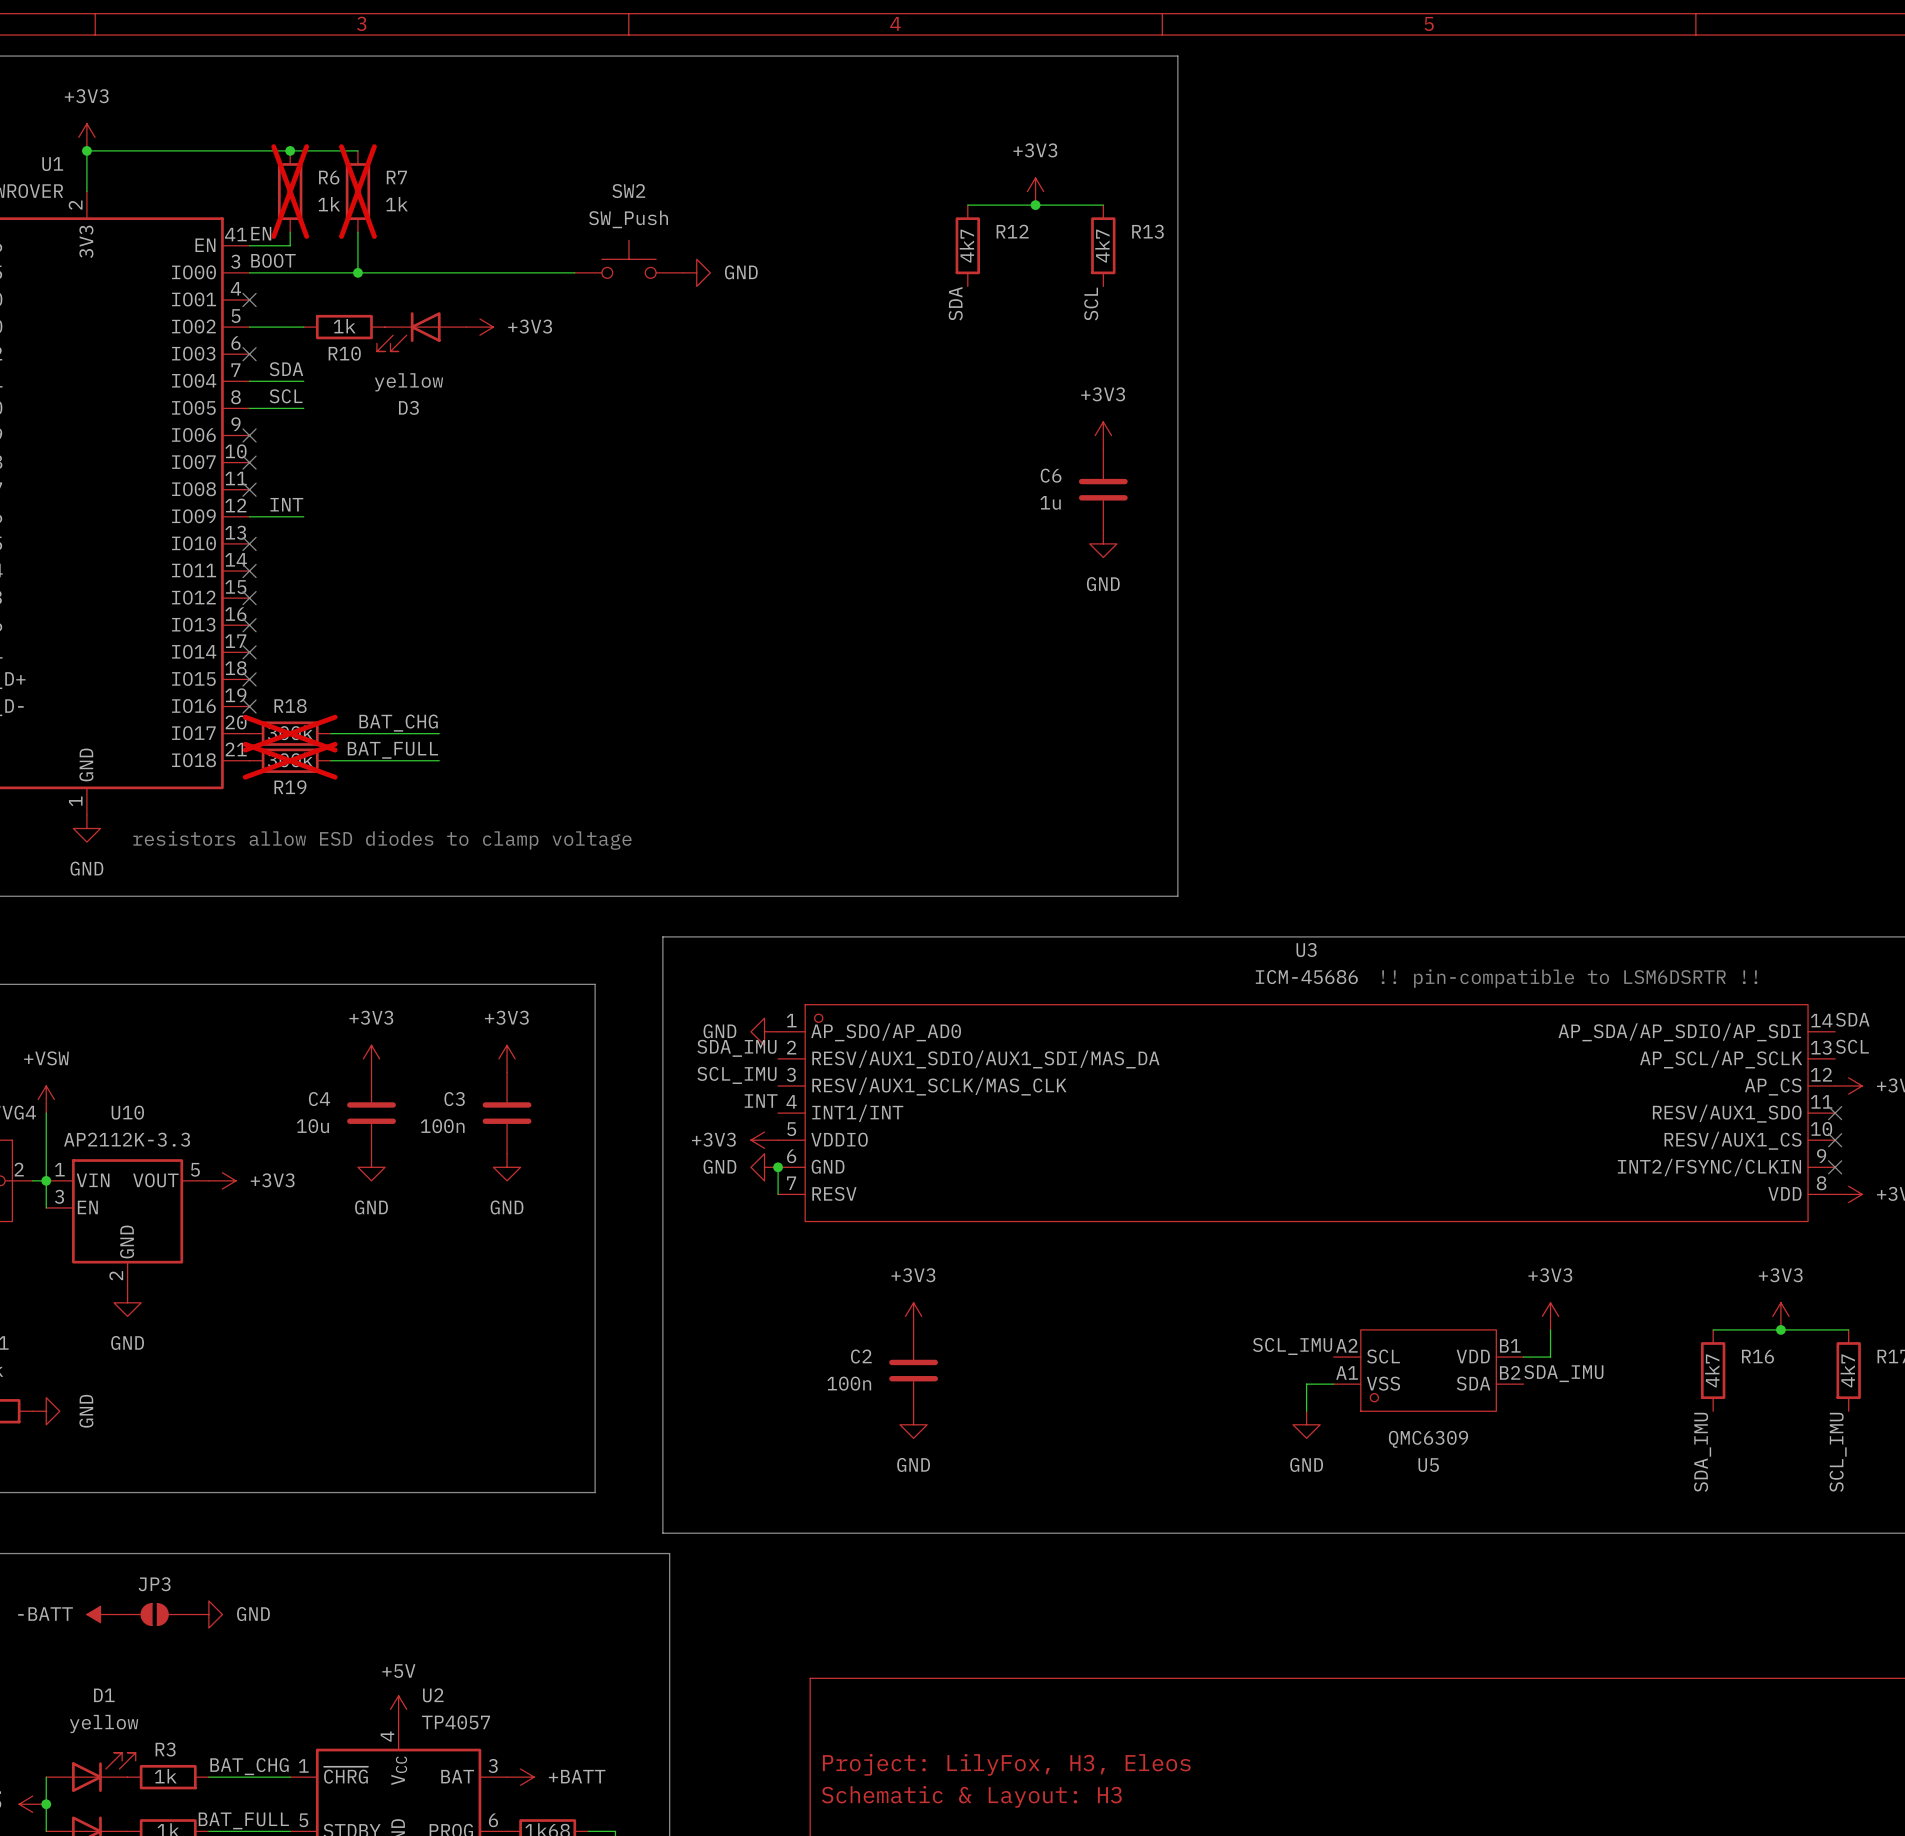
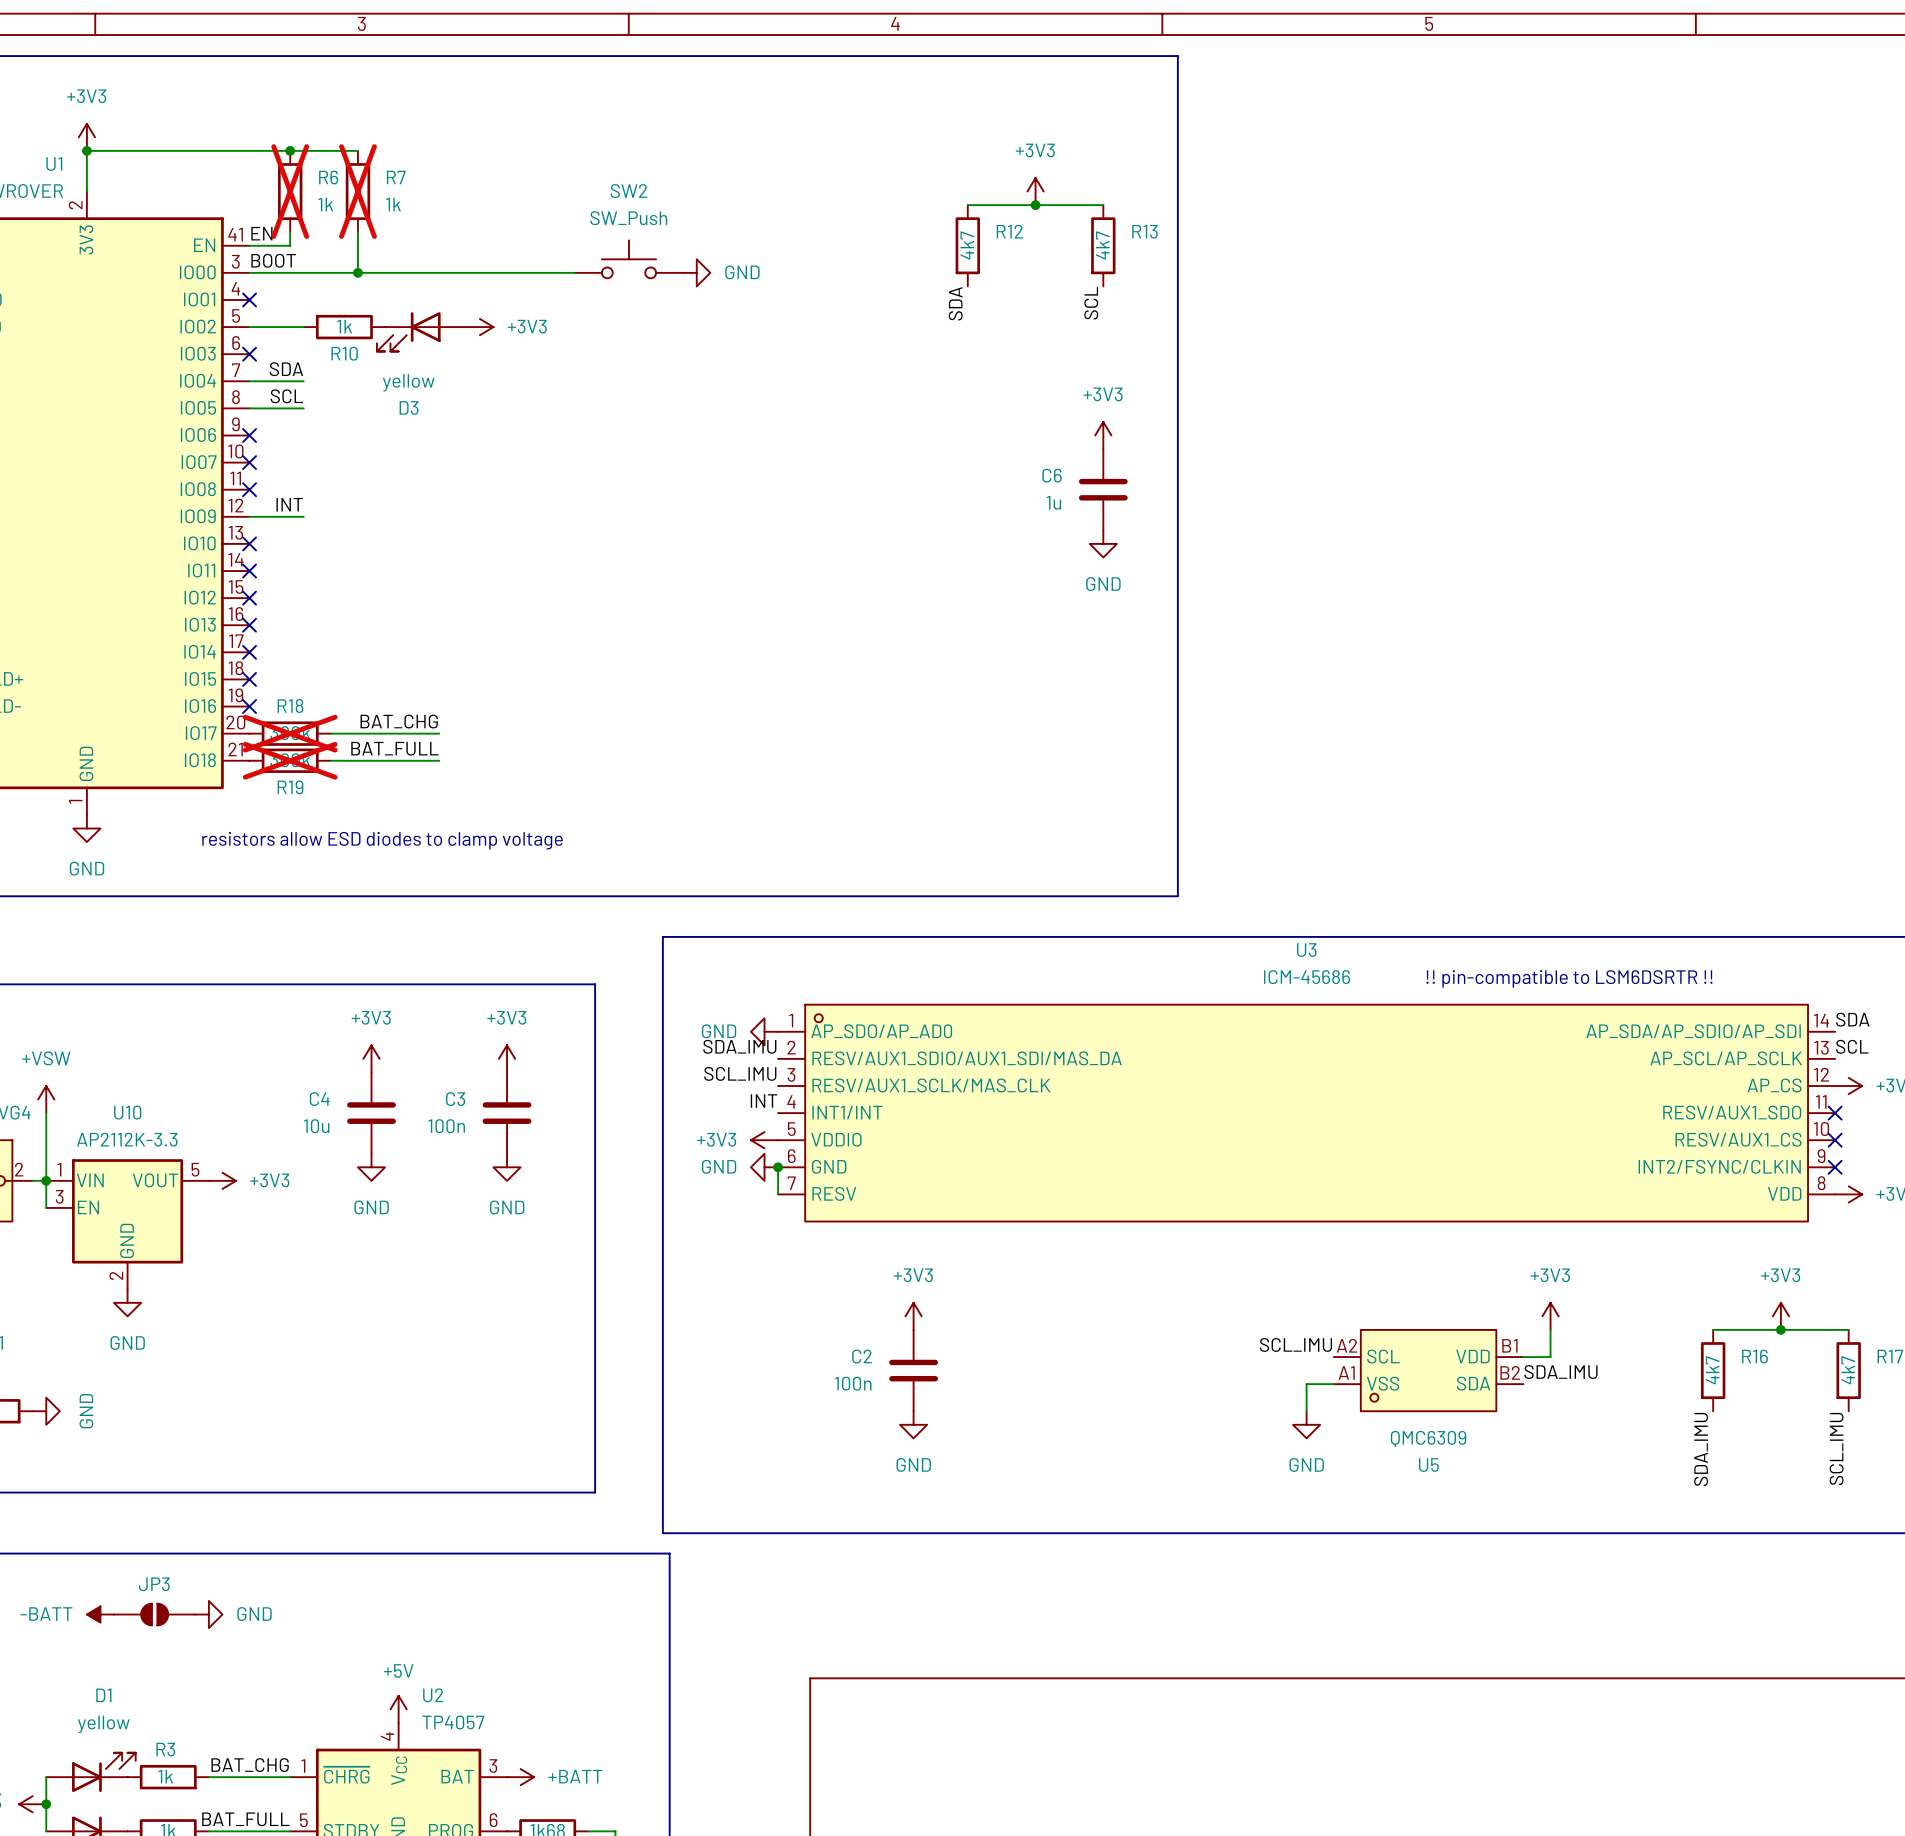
title block: Project: LilyFox, H3, Eleos (1006, 1764) -> none
title block: Schematic & Layout: H3 (971, 1796) -> none

